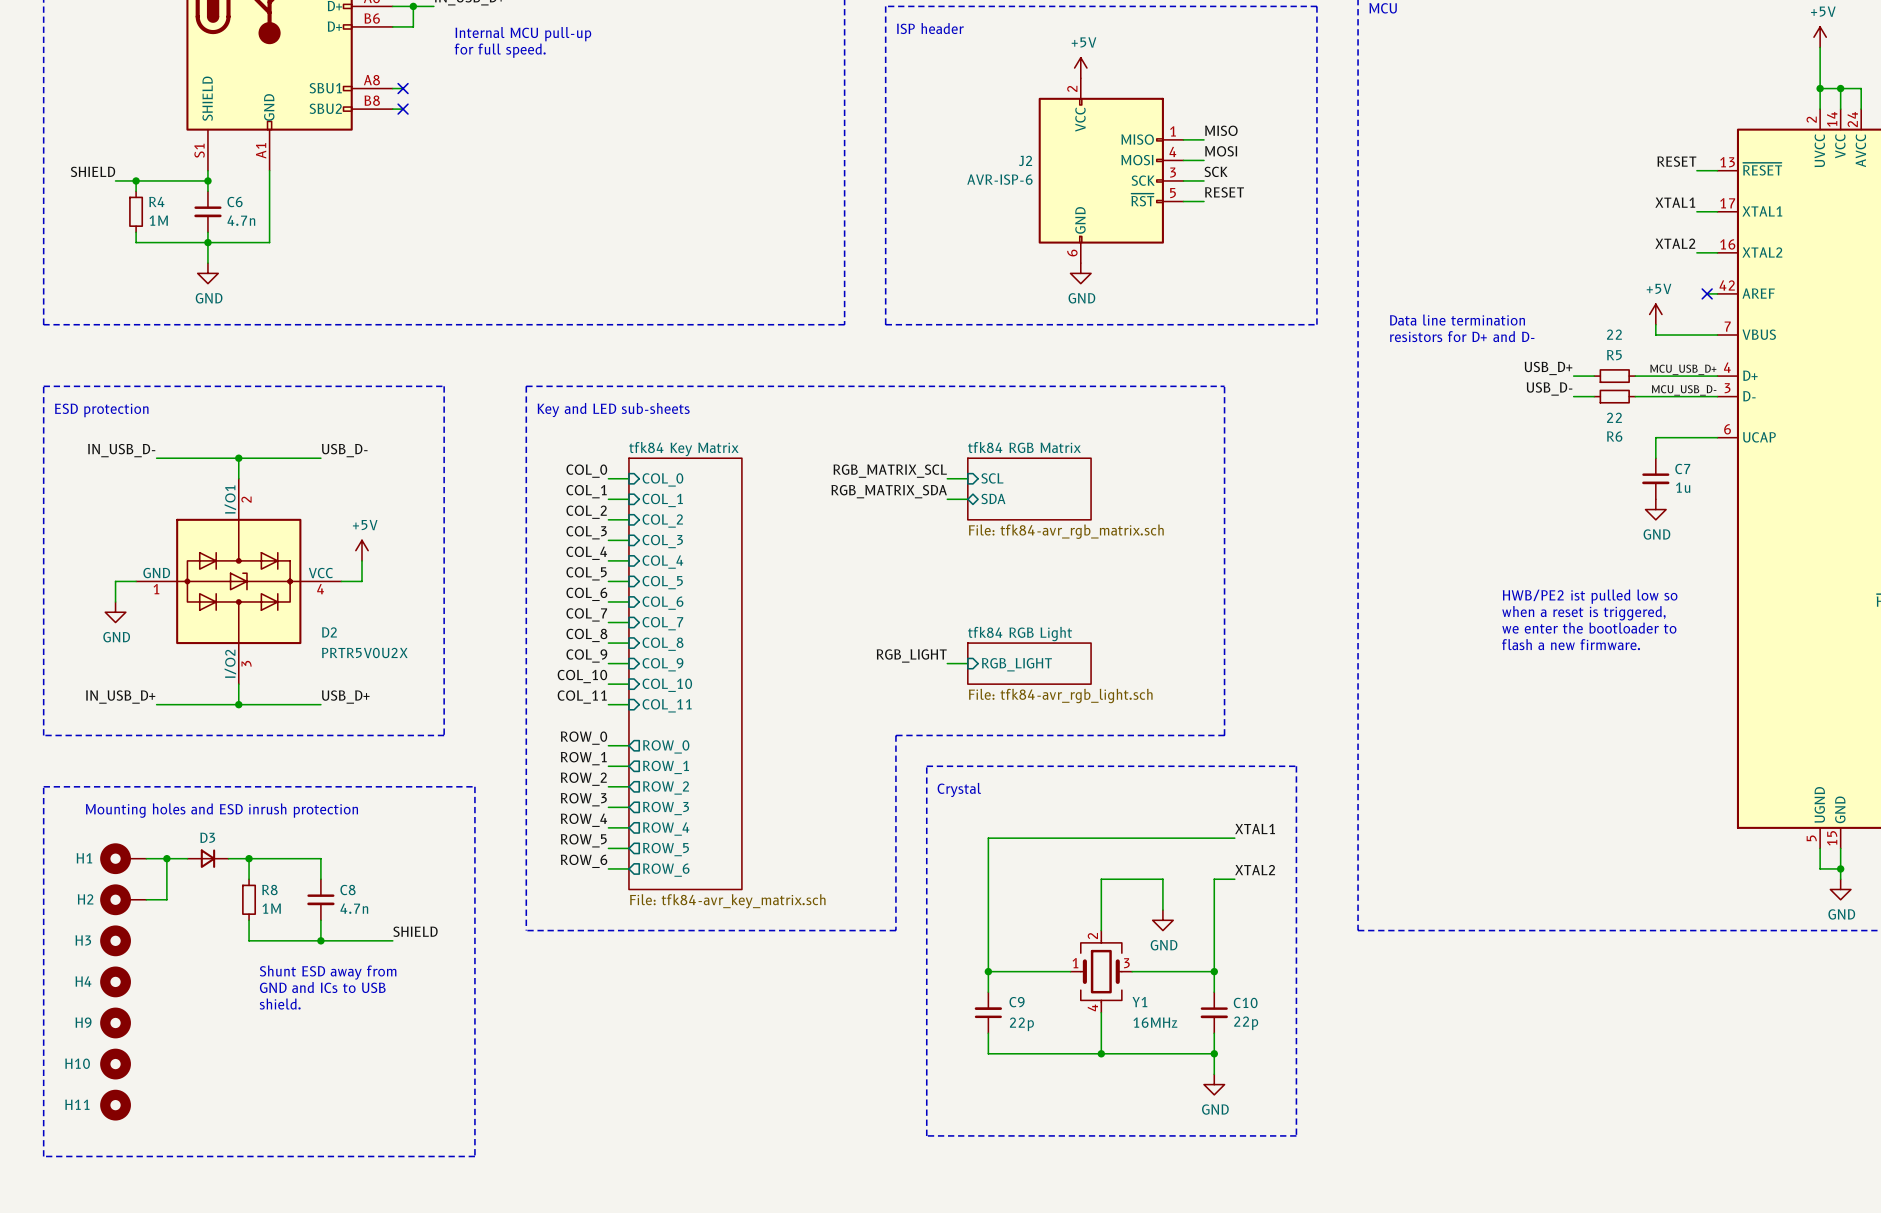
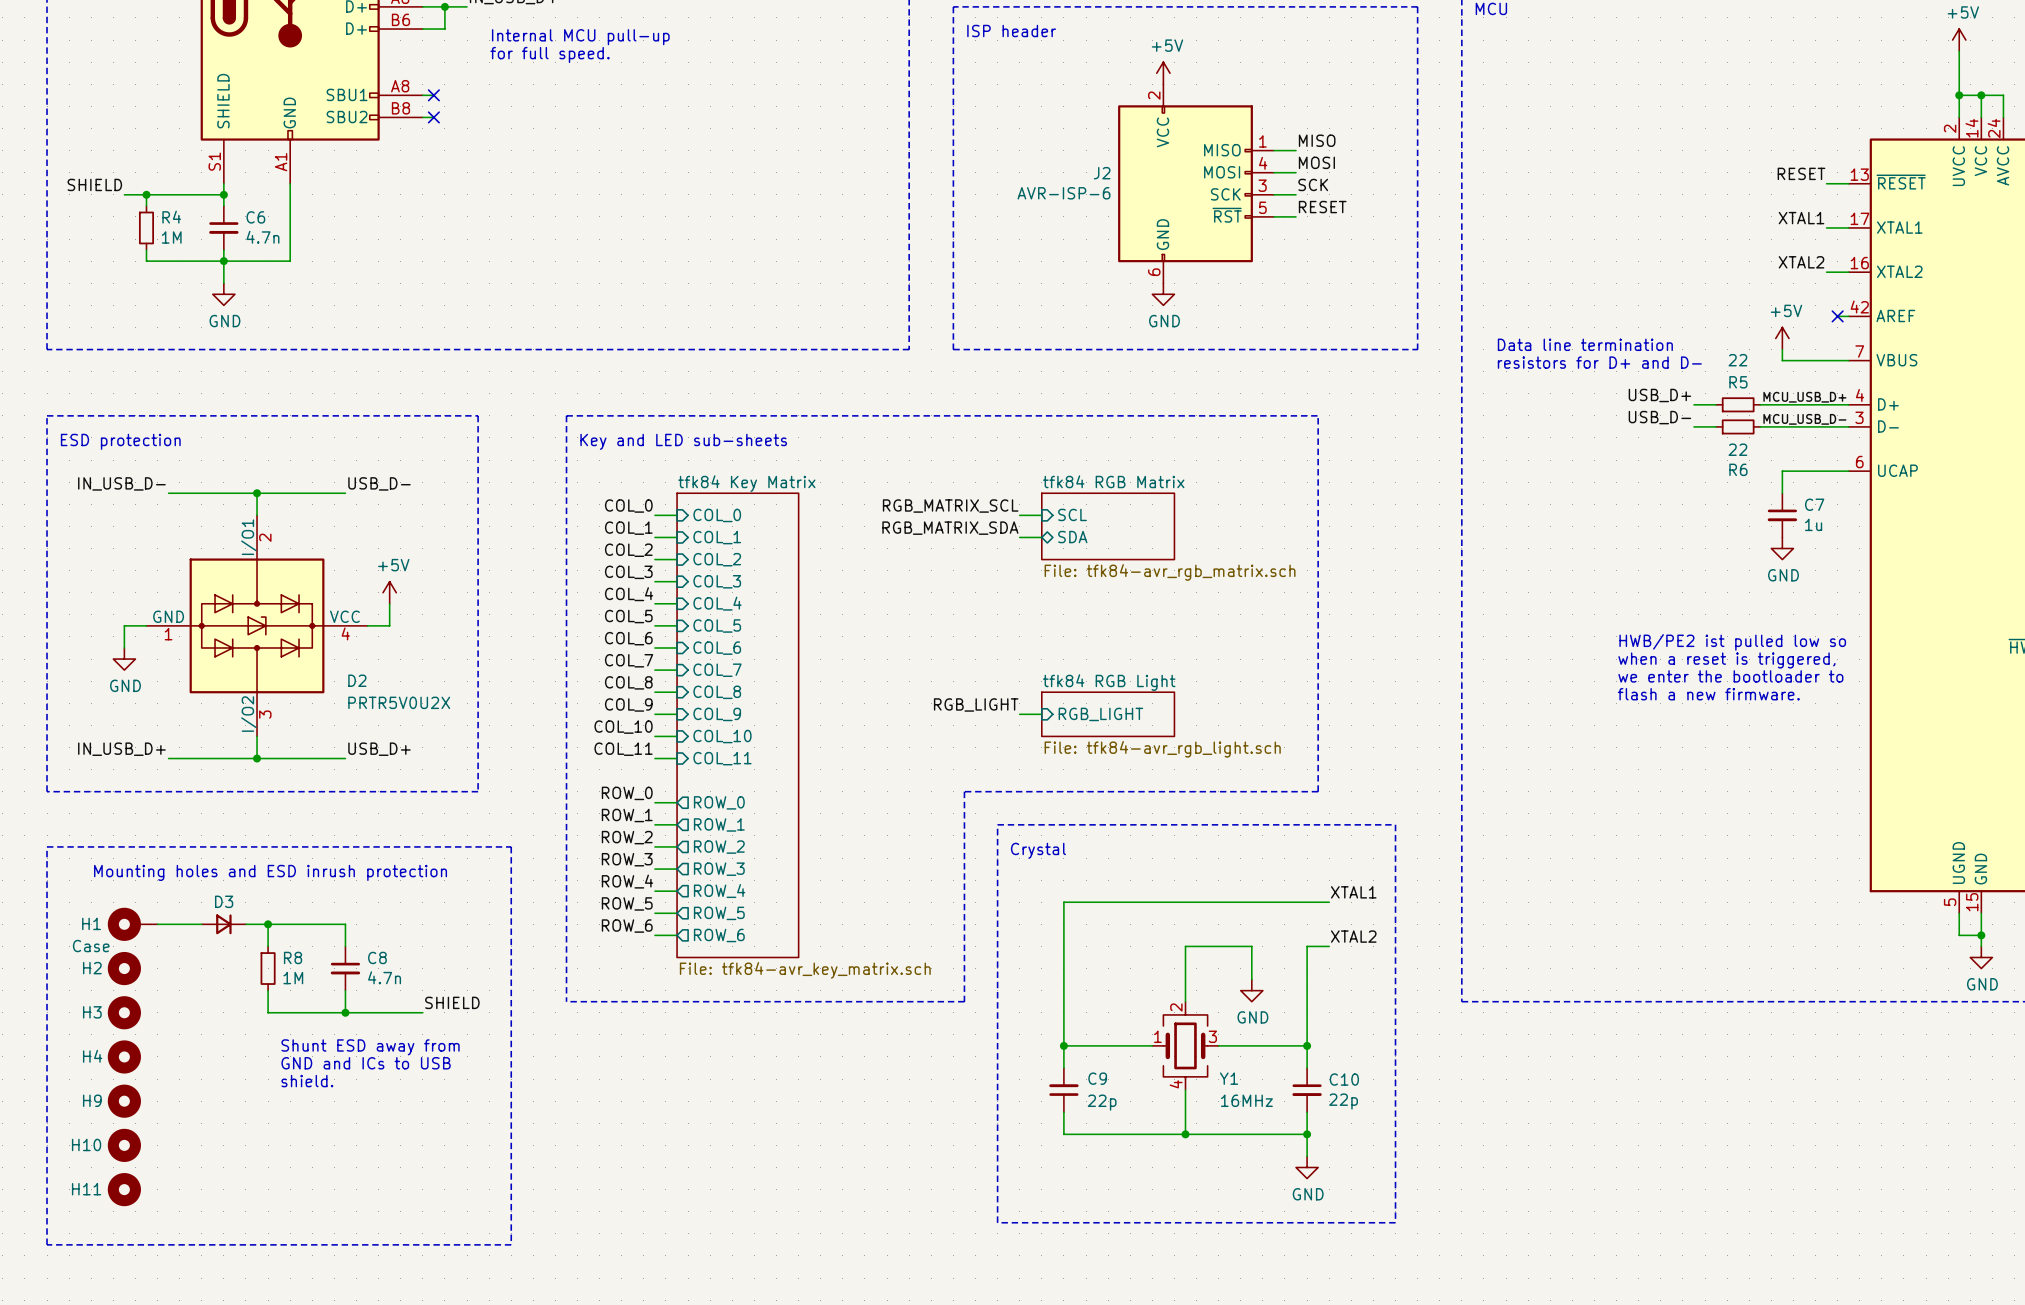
wire: (166, 858) (166, 899) (146, 899) -> none
junction: (166, 858) -> none
H1 value: none -> Case (91, 946)
H2 symbol: [100, 884, 147, 916] -> [107, 951, 141, 986]

